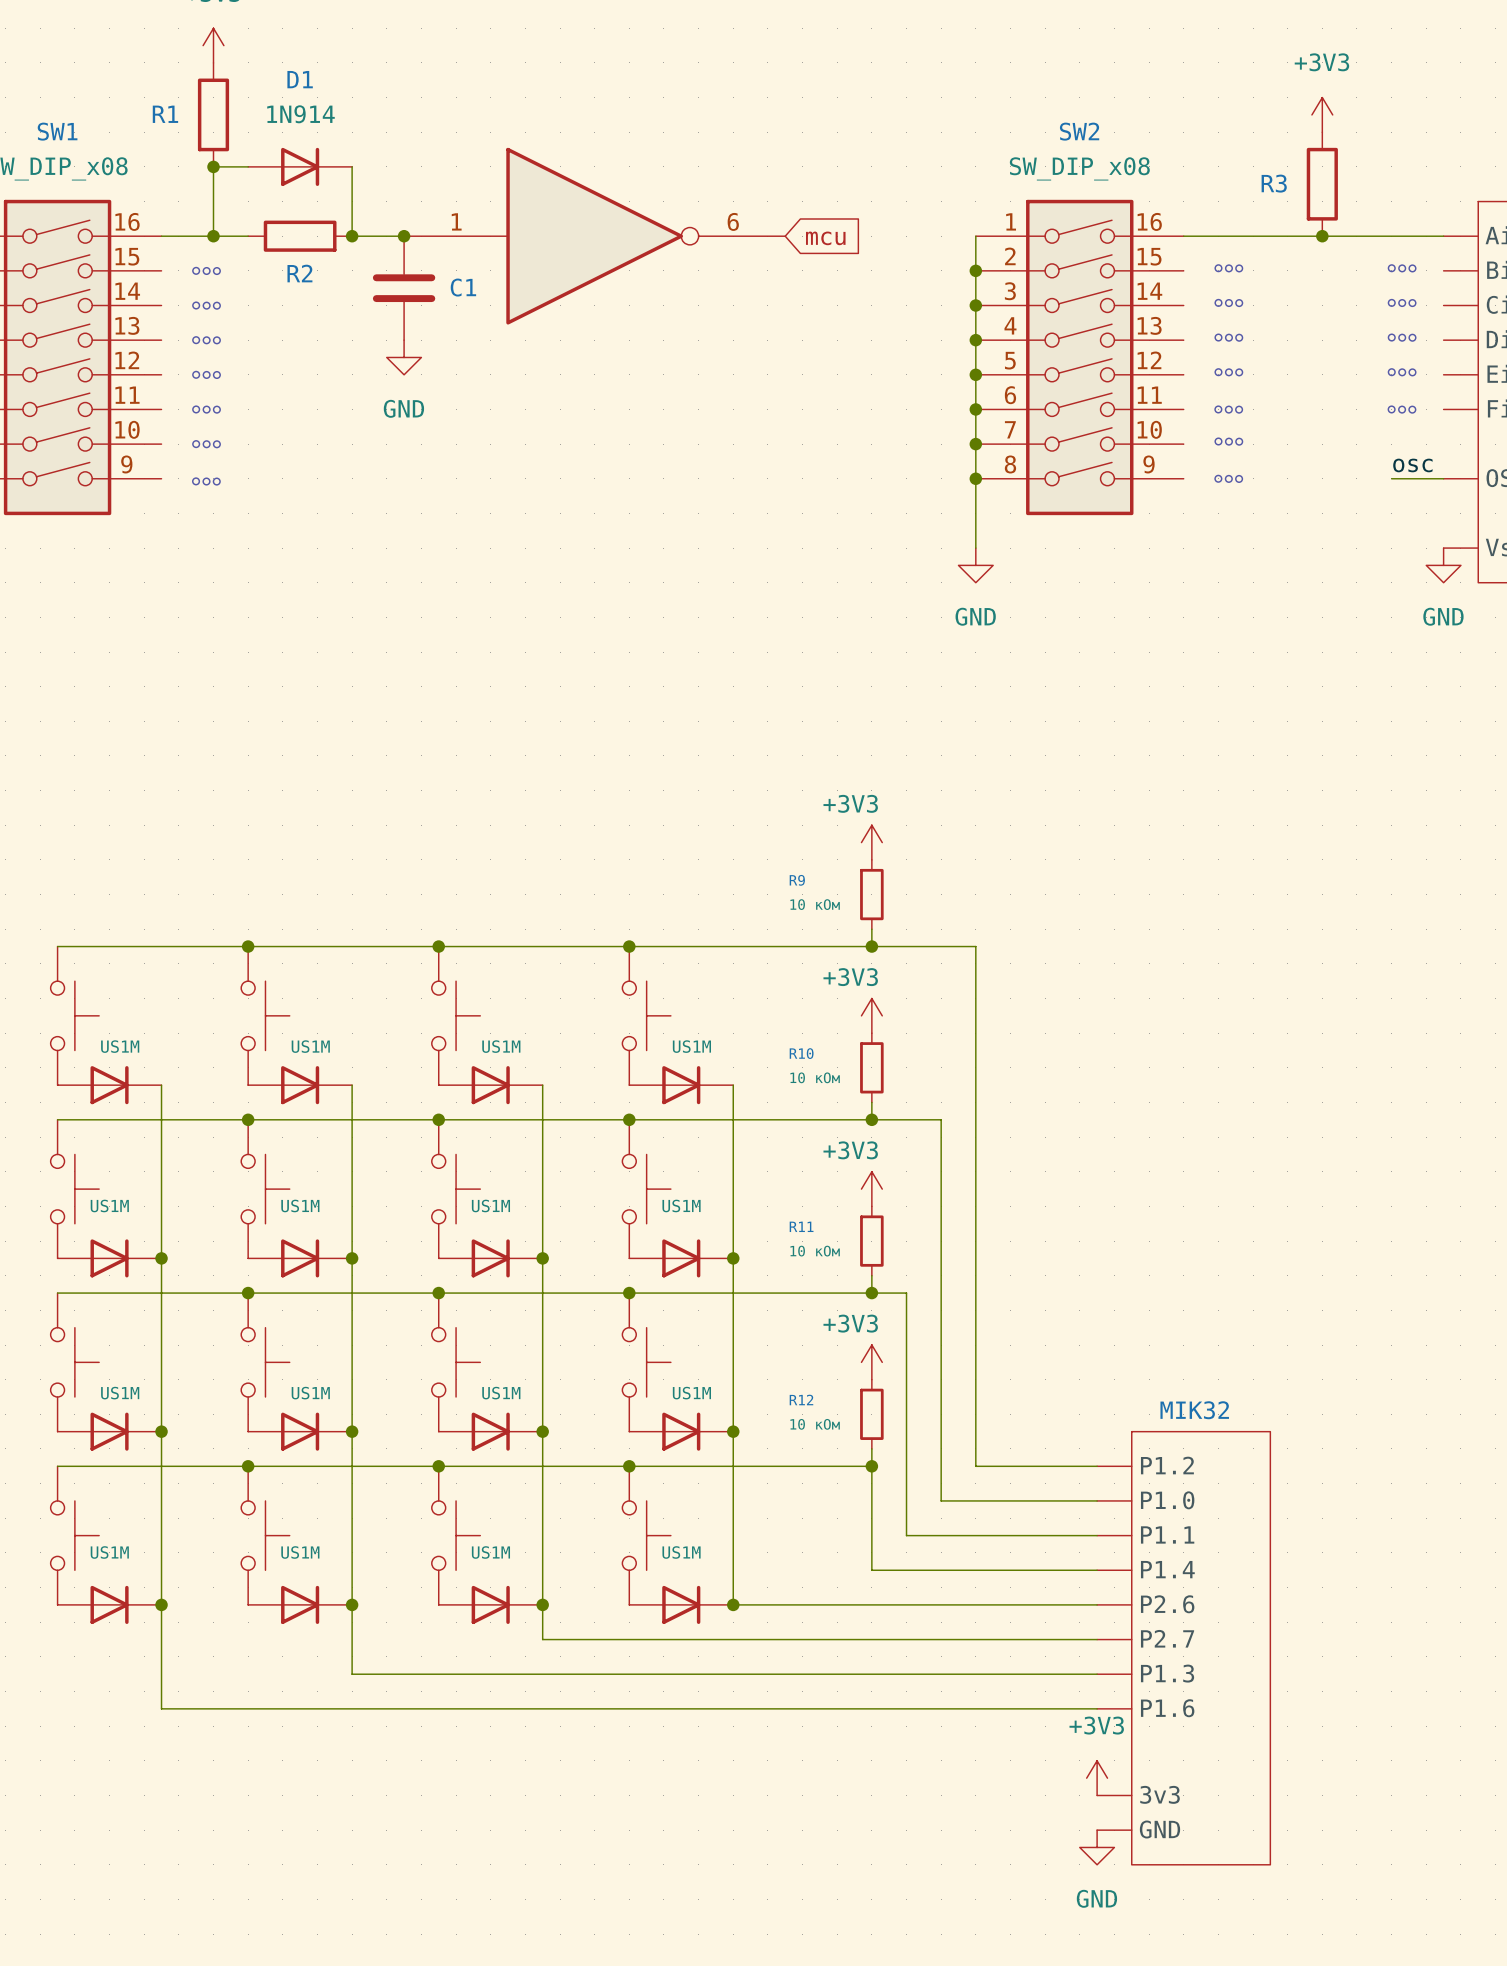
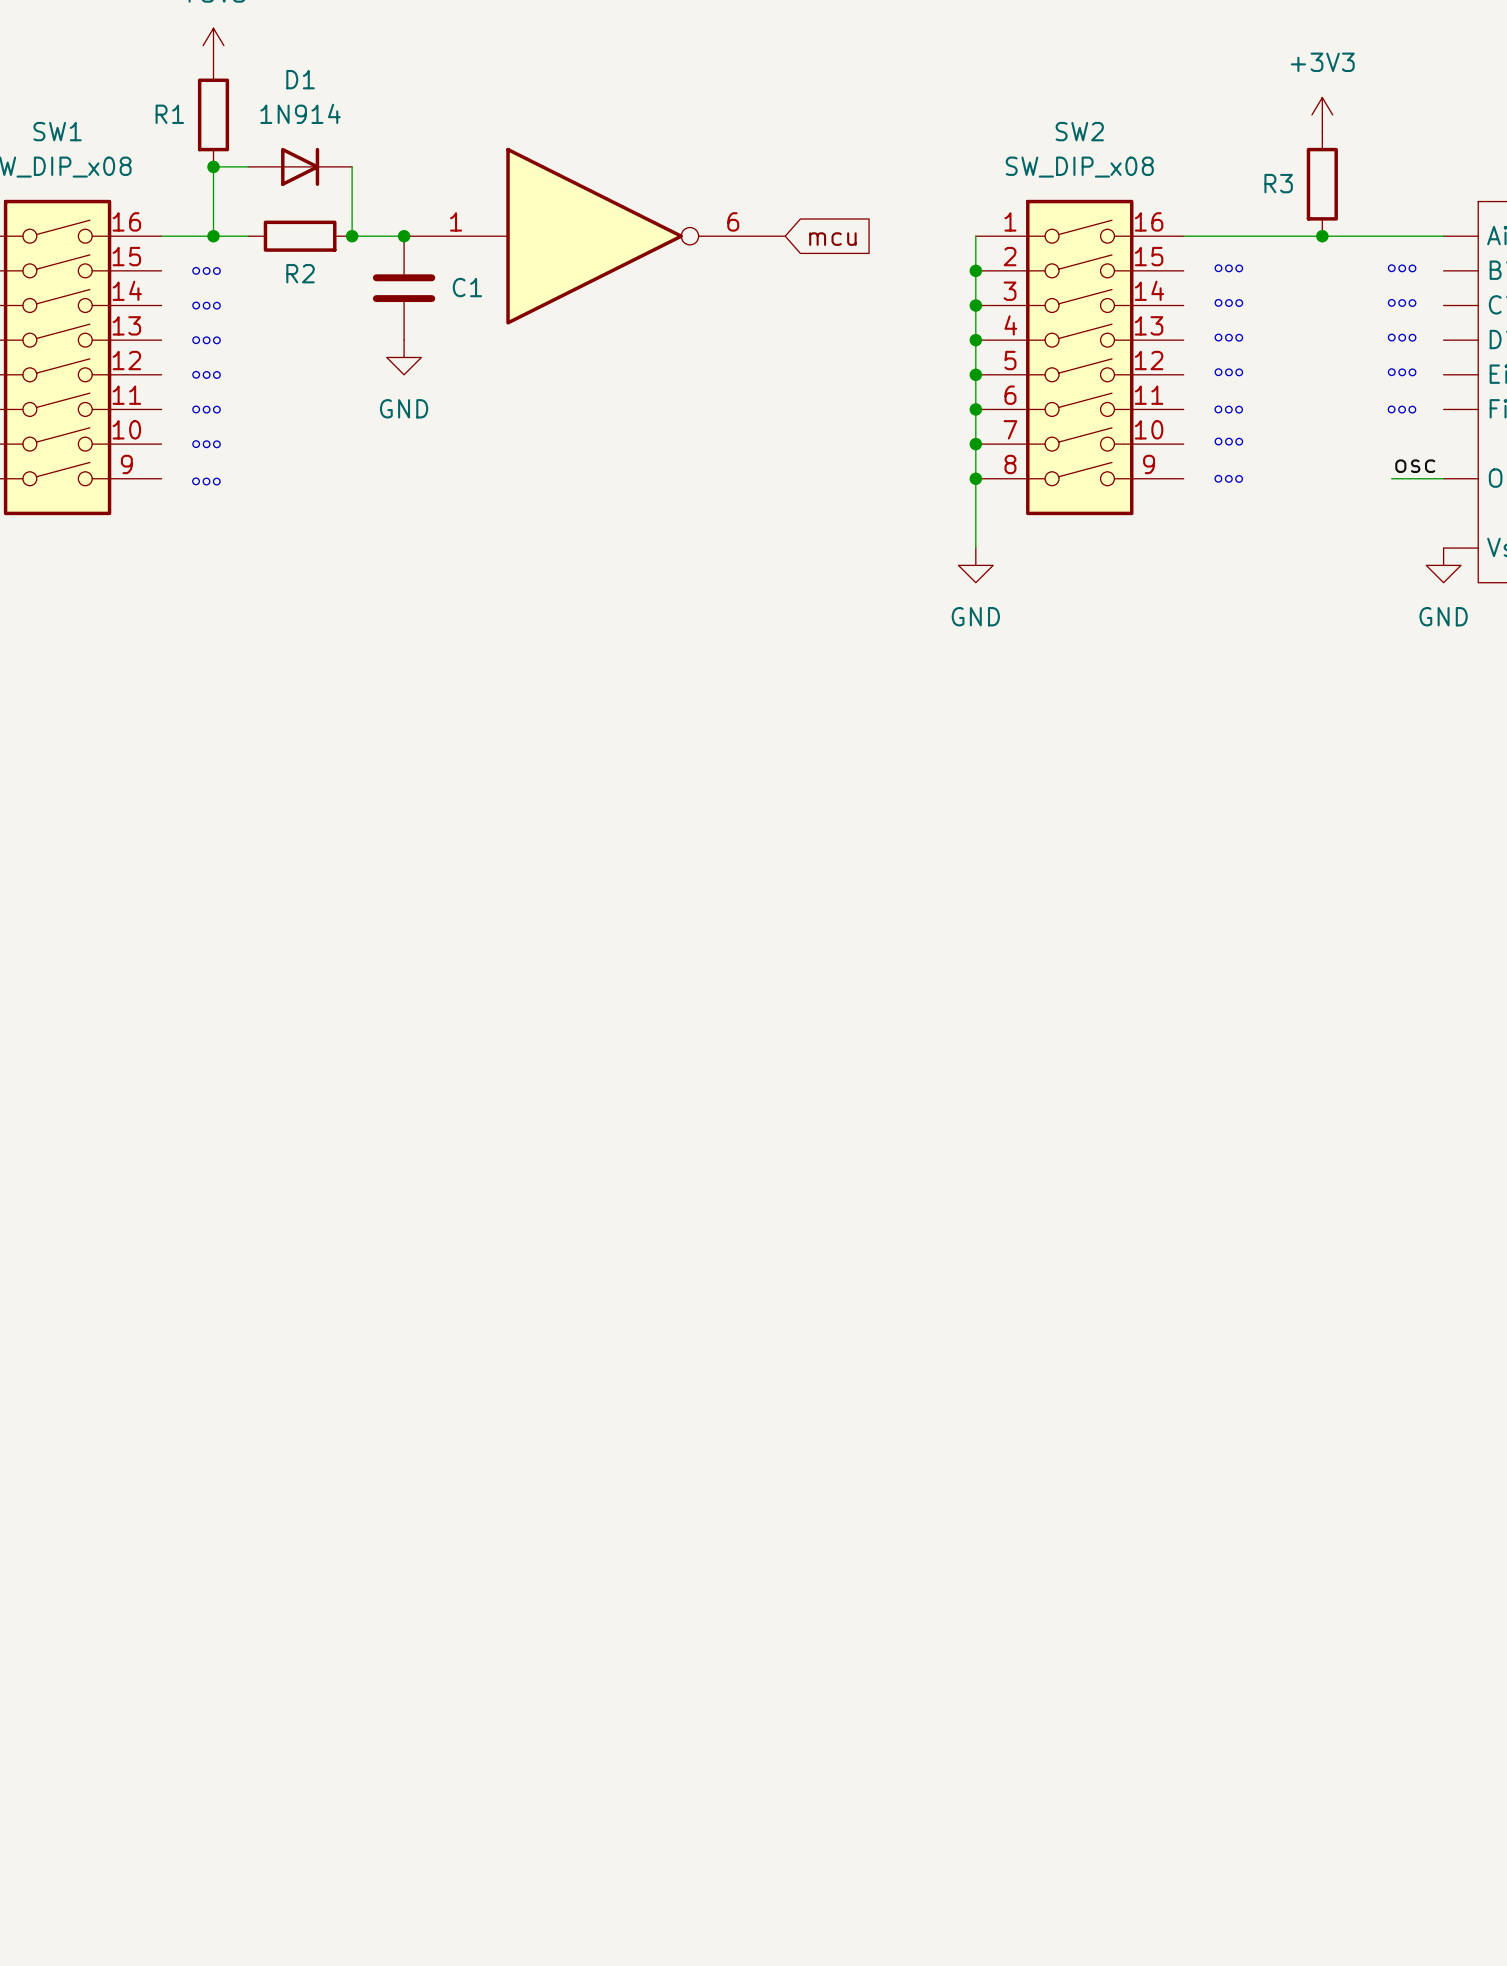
power symbol: +3V3 (871, 842) -> none
R9: 10 кОм (871, 894) -> none
wire: (871, 929) (871, 946) -> none
wire: (57, 946) (975, 946) (975, 1466) (1097, 1466) -> none
junction: (248, 946) -> none
junction: (438, 946) -> none
junction: (629, 946) -> none
junction: (871, 946) -> none
part: (74, 1015) -> none
part: (265, 1015) -> none
part: (456, 1015) -> none
part: (646, 1015) -> none
power symbol: +3V3 (871, 1015) -> none
R10: 10 кОм (871, 1067) -> none
part: US1M (109, 1085) -> none
wire: (161, 1085) (161, 1708) (1097, 1708) -> none
part: US1M (300, 1085) -> none
wire: (352, 1085) (352, 1674) (1097, 1674) -> none
part: US1M (490, 1085) -> none
wire: (542, 1085) (542, 1639) (1097, 1639) -> none
part: US1M (681, 1085) -> none
wire: (733, 1085) (733, 1604) (1097, 1604) -> none
wire: (871, 1102) (871, 1119) -> none
wire: (57, 1119) (941, 1119) (941, 1500) (1097, 1500) -> none
junction: (248, 1119) -> none
junction: (438, 1119) -> none
junction: (629, 1119) -> none
junction: (871, 1119) -> none
part: (74, 1189) -> none
part: (265, 1189) -> none
part: (456, 1189) -> none
part: (646, 1189) -> none
power symbol: +3V3 (871, 1189) -> none
R11: 10 кОм (871, 1241) -> none
part: US1M (109, 1258) -> none
junction: (161, 1258) -> none
part: US1M (300, 1258) -> none
junction: (352, 1258) -> none
part: US1M (490, 1258) -> none
junction: (542, 1258) -> none
part: US1M (681, 1258) -> none
junction: (733, 1258) -> none
wire: (871, 1275) (871, 1293) -> none
wire: (57, 1293) (906, 1293) (906, 1535) (1097, 1535) -> none
junction: (248, 1293) -> none
junction: (438, 1293) -> none
junction: (629, 1293) -> none
junction: (871, 1293) -> none
part: (74, 1362) -> none
part: (265, 1362) -> none
part: (456, 1362) -> none
part: (646, 1362) -> none
power symbol: +3V3 (871, 1362) -> none
R12: 10 кОм (871, 1414) -> none
part: US1M (109, 1431) -> none
junction: (161, 1431) -> none
part: US1M (300, 1431) -> none
junction: (352, 1431) -> none
part: US1M (490, 1431) -> none
junction: (542, 1431) -> none
part: US1M (681, 1431) -> none
junction: (733, 1431) -> none
wire: (871, 1448) (871, 1570) (1097, 1570) -> none
wire: (57, 1466) (871, 1466) -> none
junction: (248, 1466) -> none
junction: (438, 1466) -> none
junction: (629, 1466) -> none
junction: (871, 1466) -> none
part: (74, 1535) -> none
part: (265, 1535) -> none
part: (456, 1535) -> none
part: (646, 1535) -> none
part: US1M (109, 1604) -> none
junction: (161, 1604) -> none
part: US1M (300, 1604) -> none
junction: (352, 1604) -> none
part: US1M (490, 1604) -> none
junction: (542, 1604) -> none
part: US1M (681, 1604) -> none
junction: (733, 1604) -> none
MIK32: (1183, 1648) -> none
power symbol: +3V3 (1097, 1778) -> none
power symbol: GND (1097, 1847) -> none

